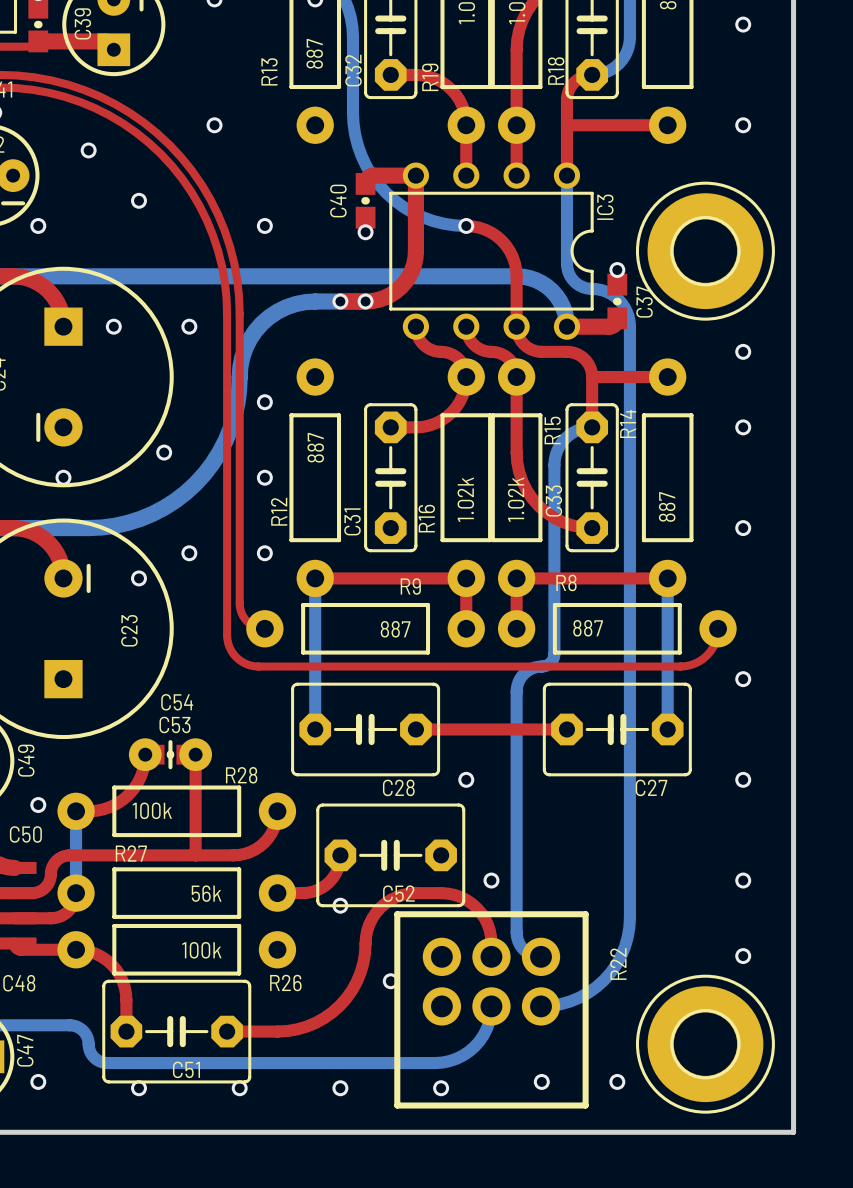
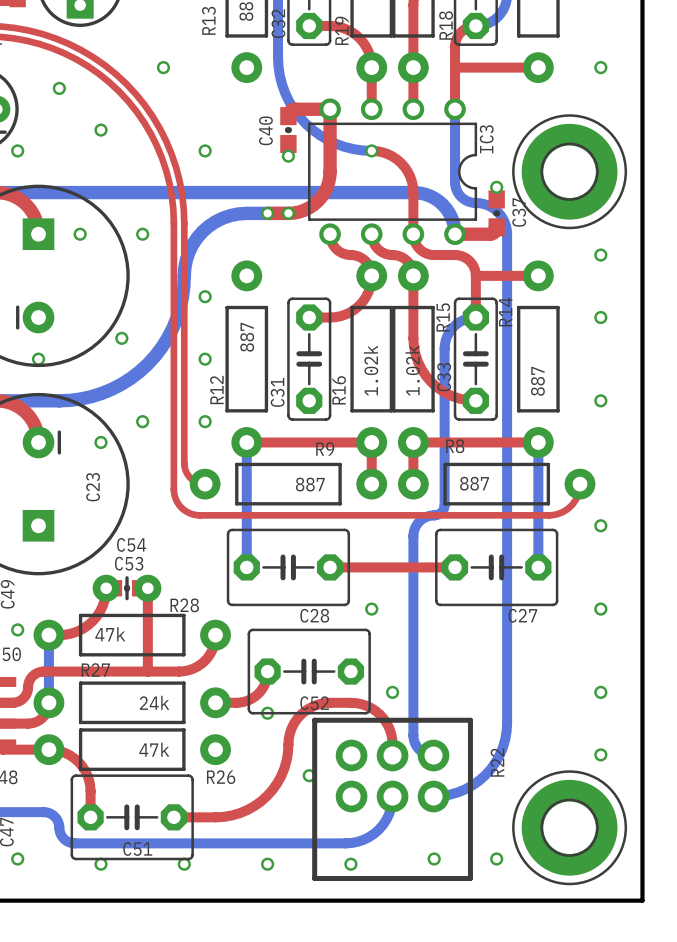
R28 value: 100k (152, 810) -> 47k (110, 634)
R27 value: 56k (206, 893) -> 24k (154, 702)
R26 value: 100k (201, 950) -> 47k (154, 749)

